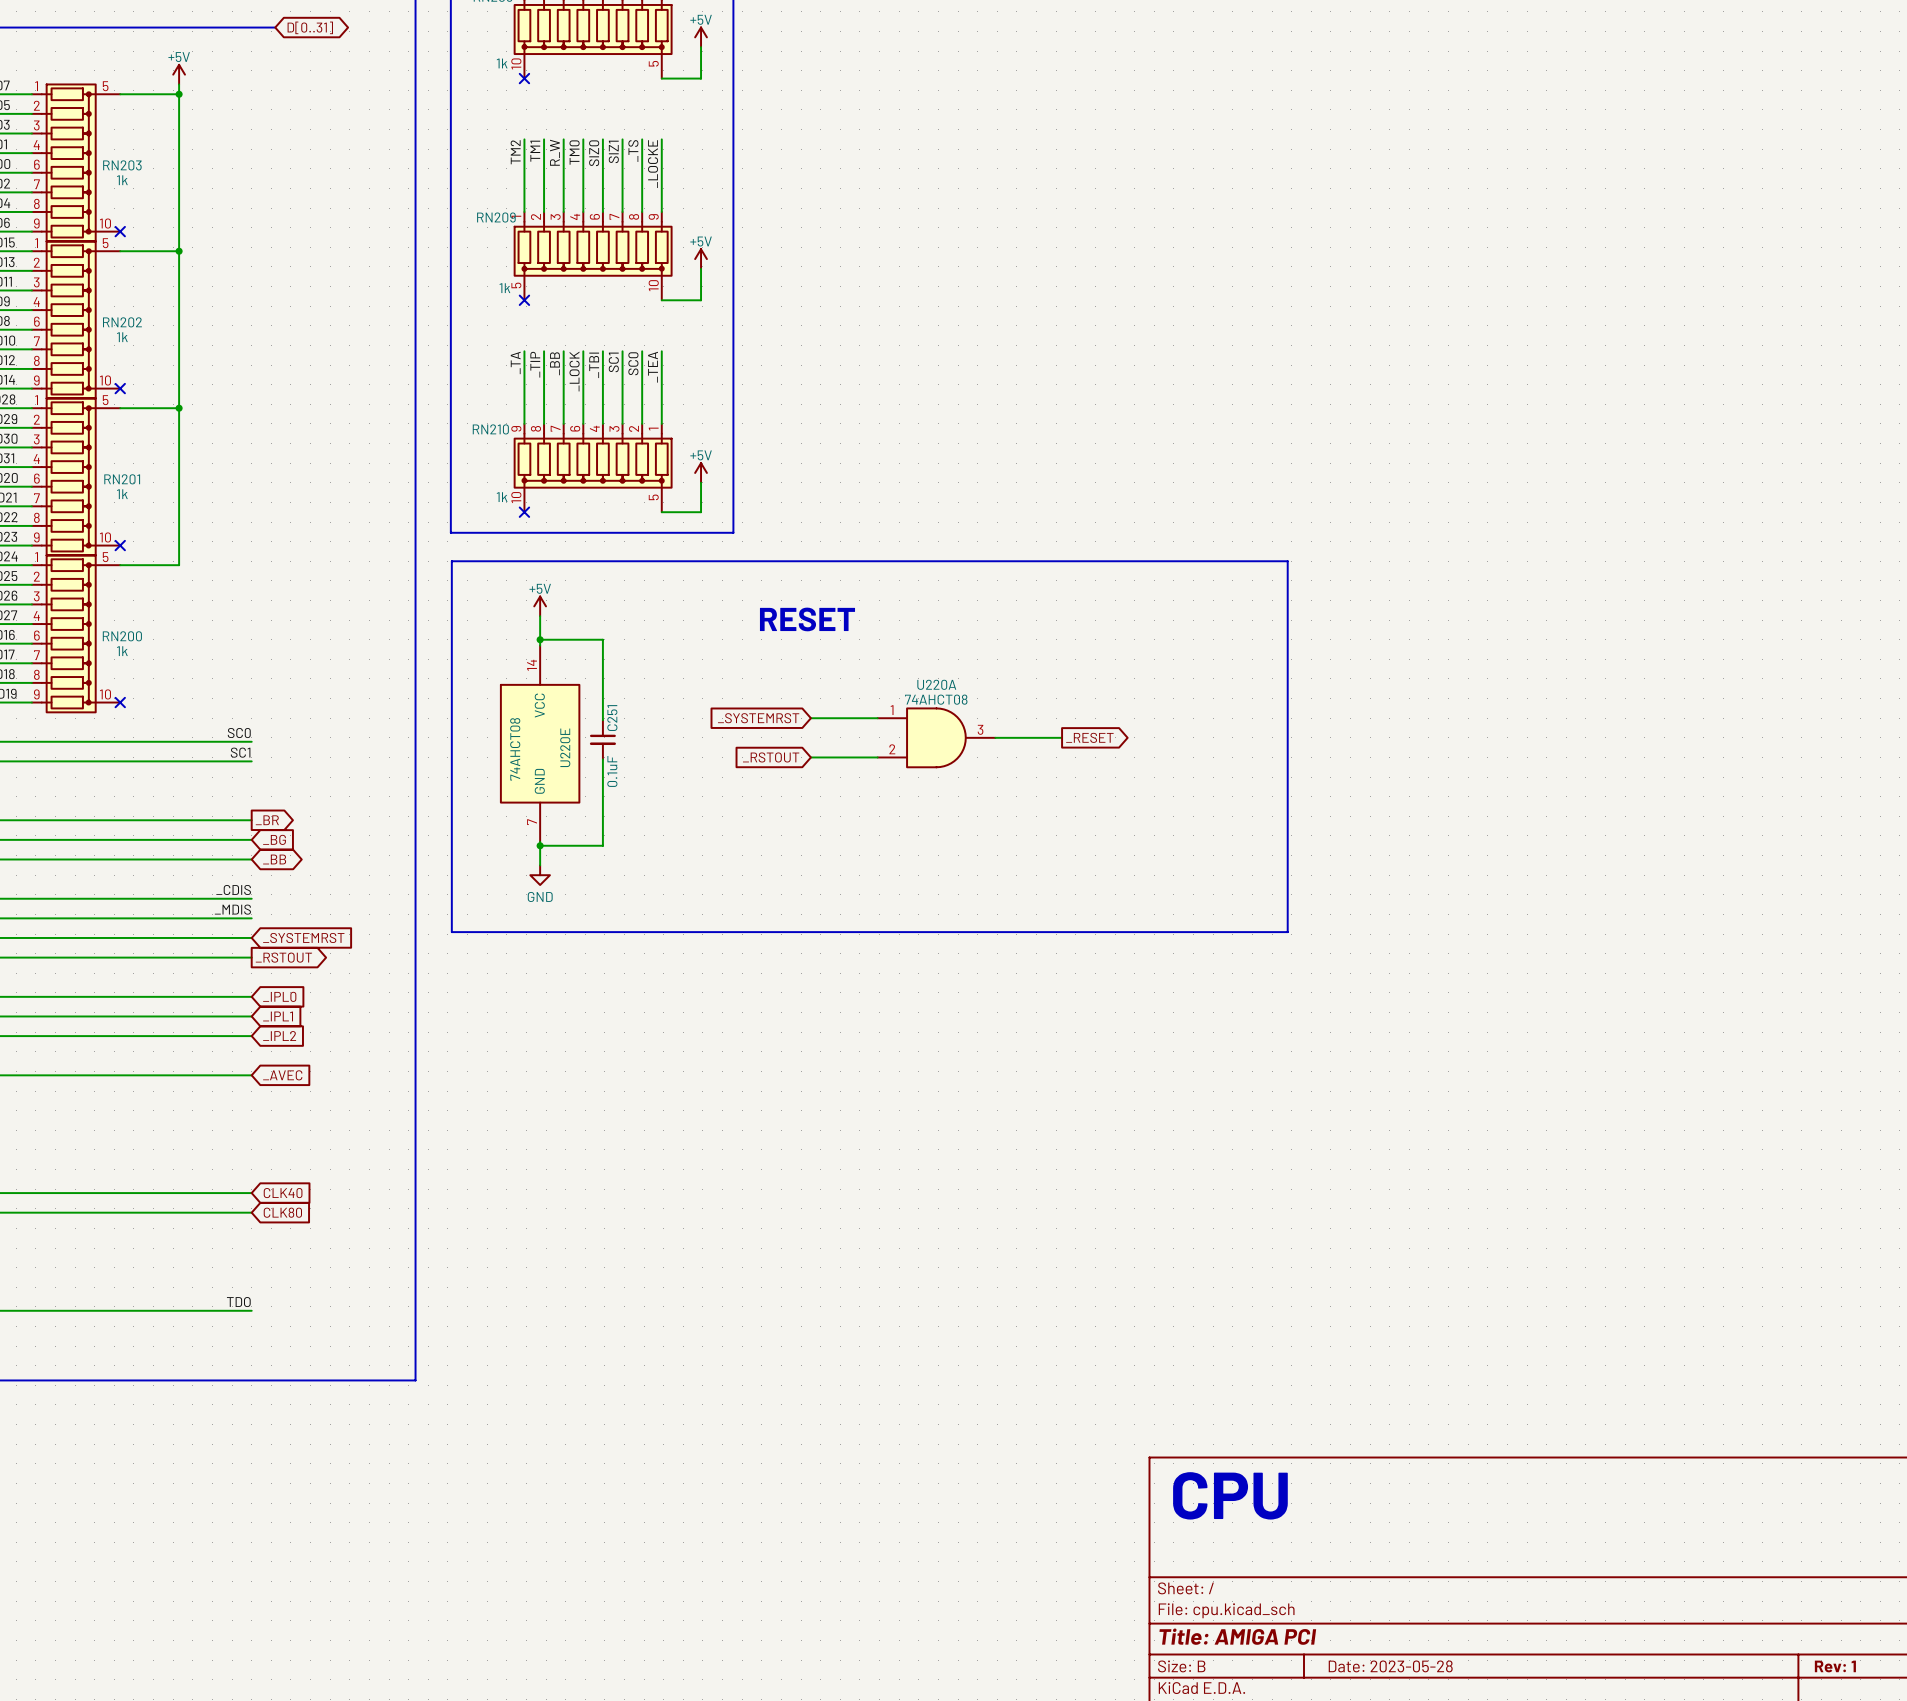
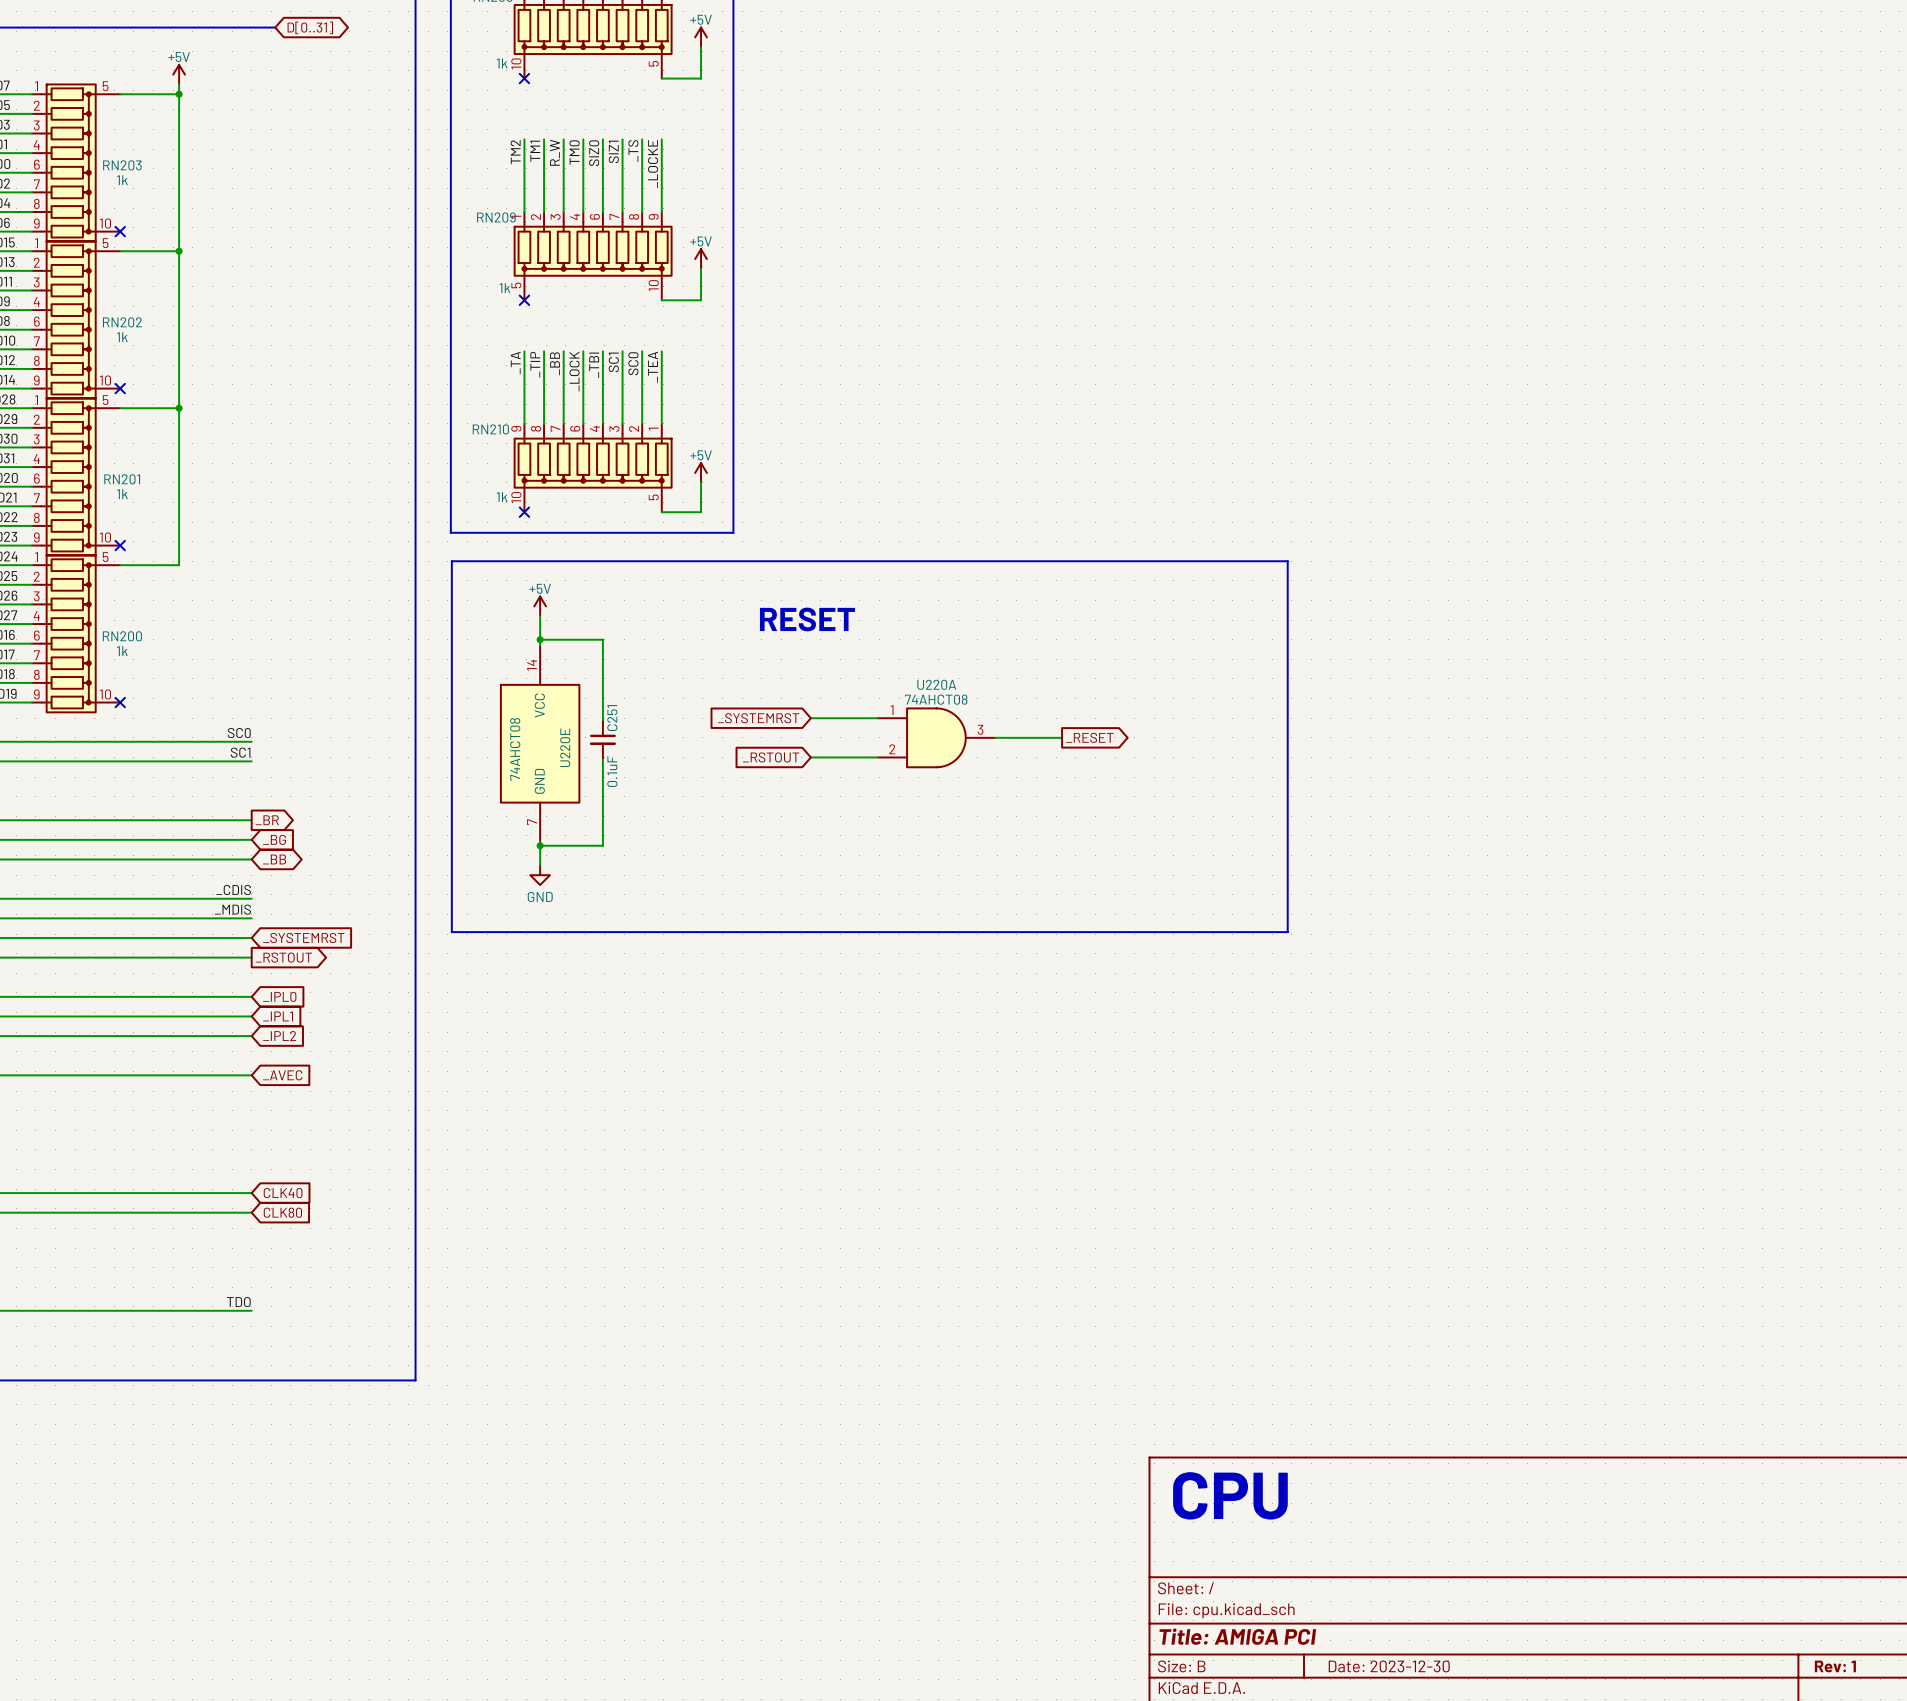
title block: Date: 2023-05-28 (1390, 1666) -> Date: 2023-12-30 (1389, 1666)

